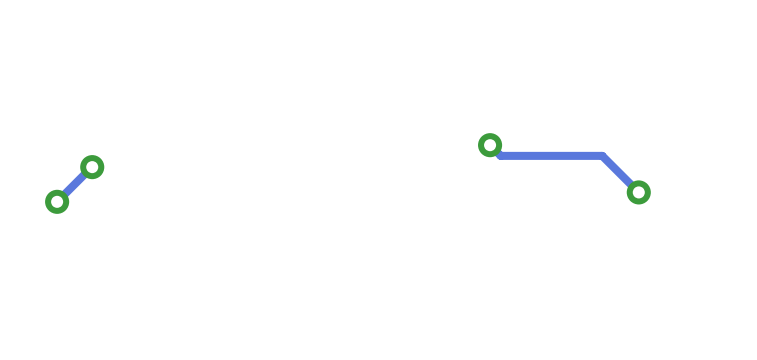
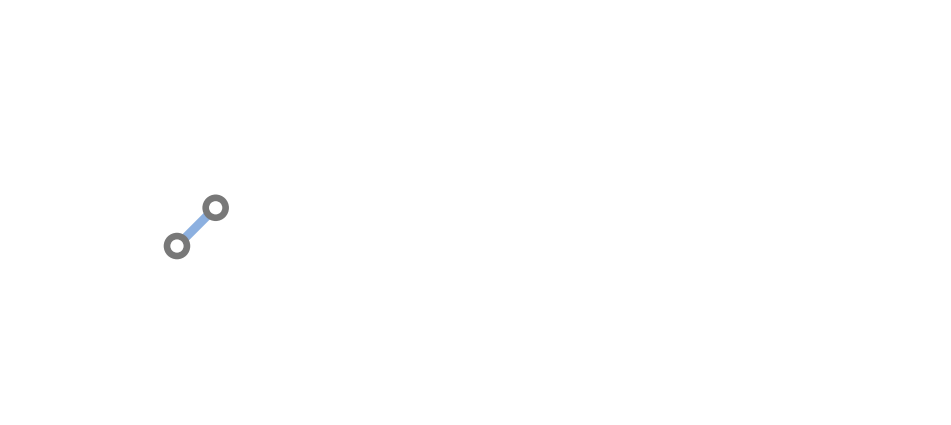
track: (490, 145) (500, 155) (602, 155) (638, 192) -> none
via: (490, 145) -> none
via: (638, 192) -> none

